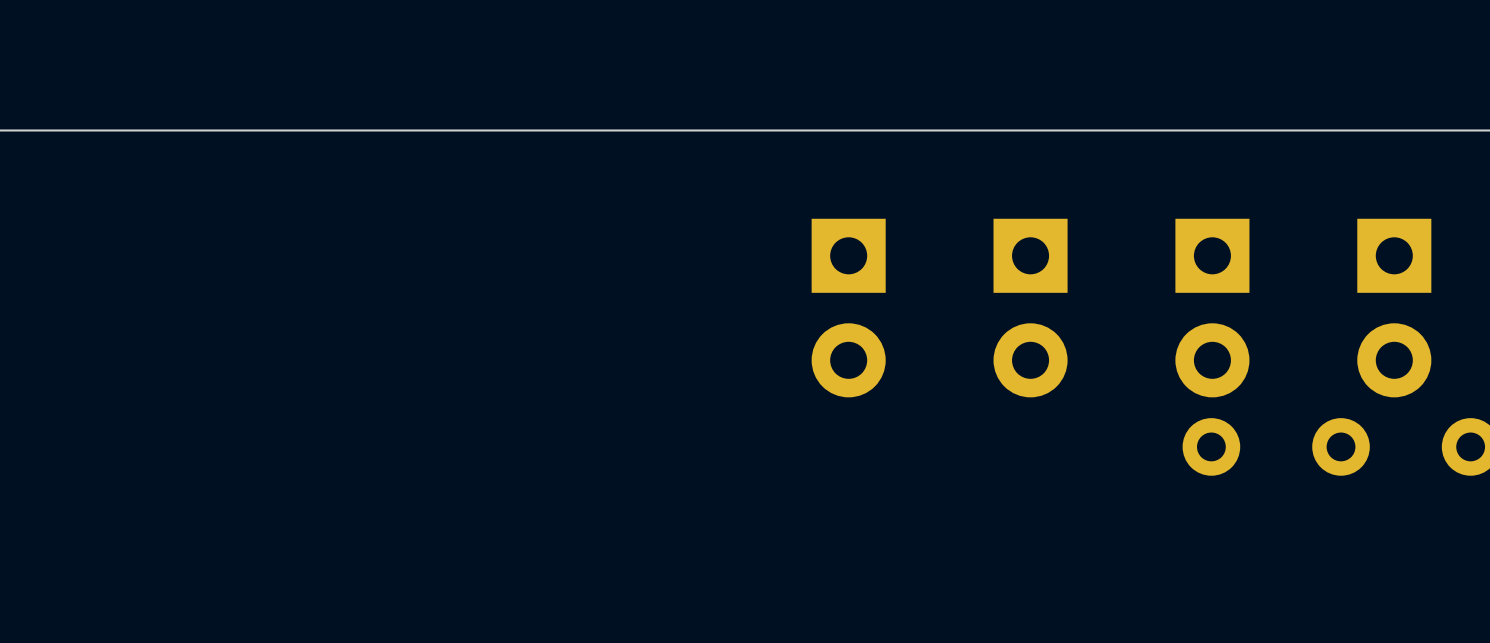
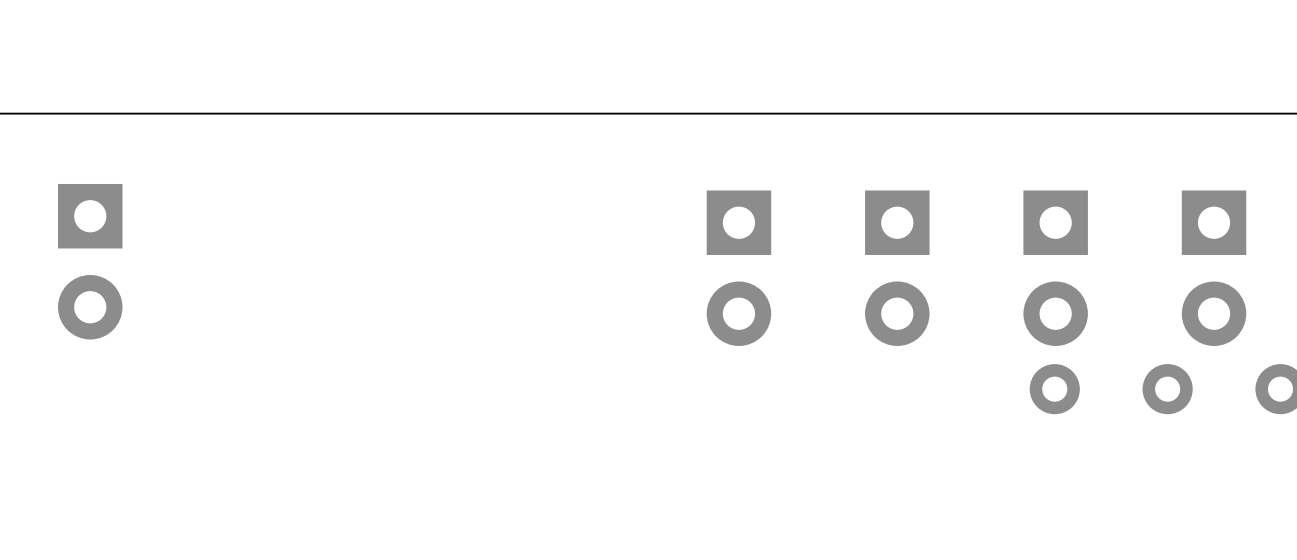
part: none -> (90, 261)

